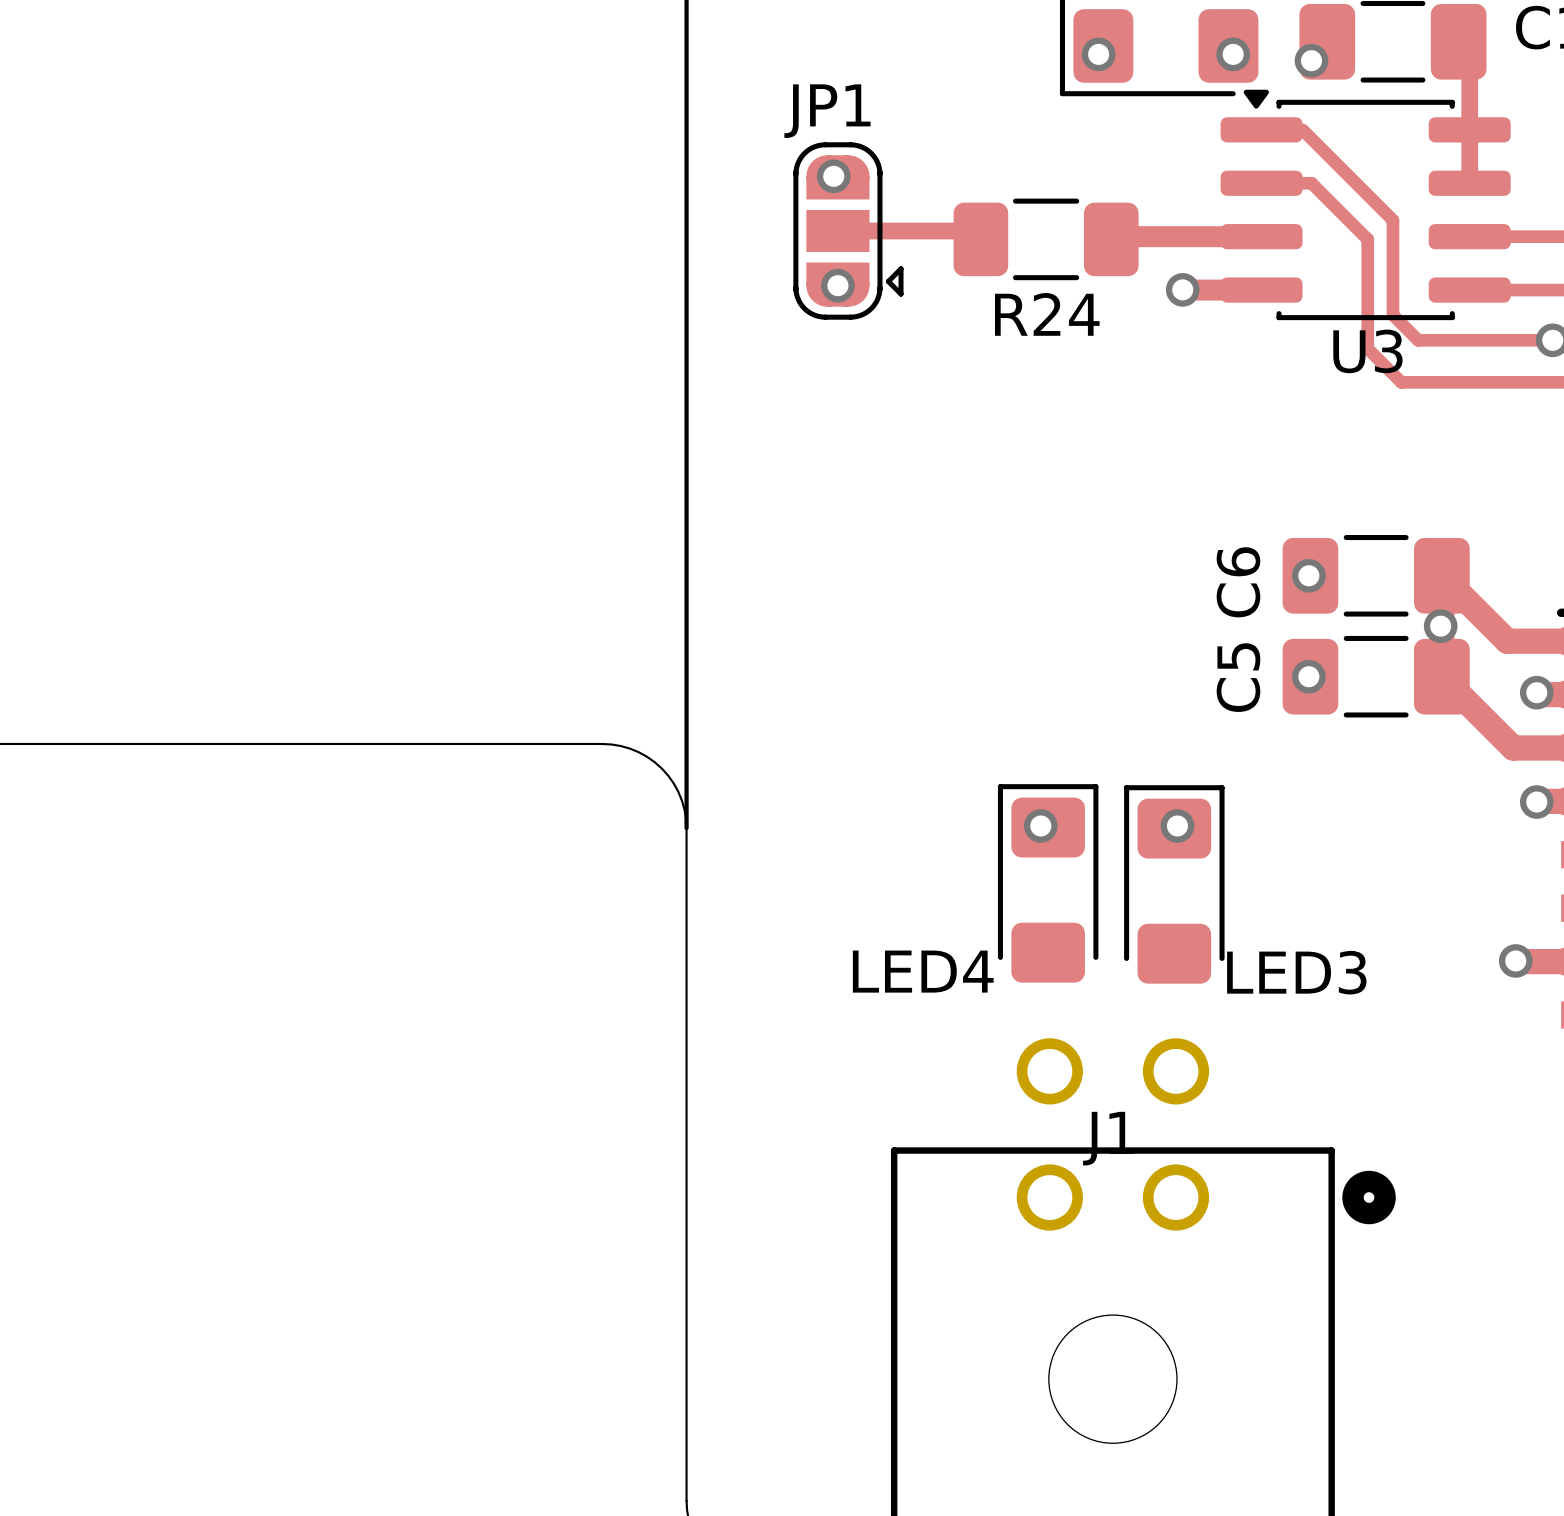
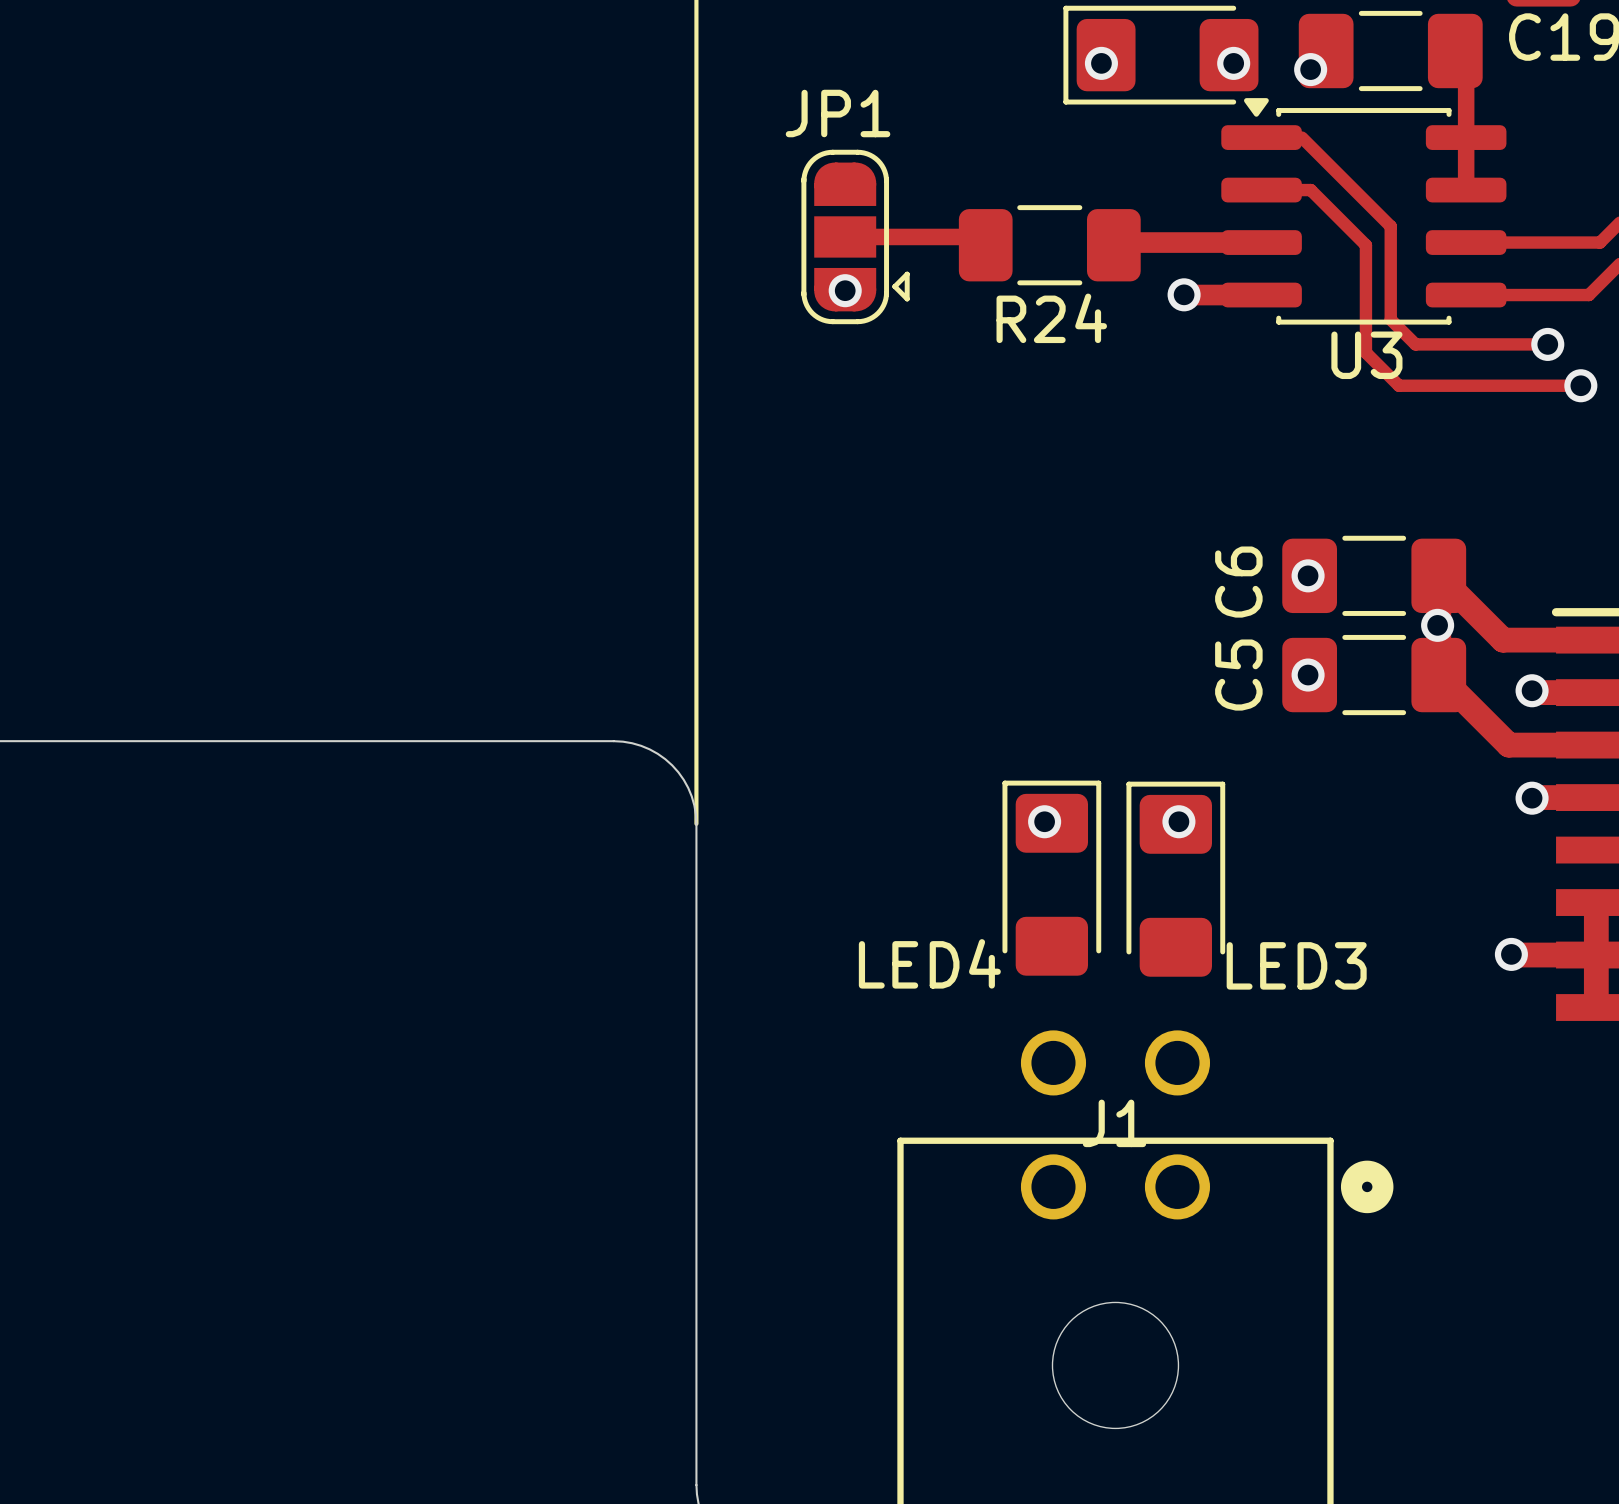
via: (833, 176) -> none

